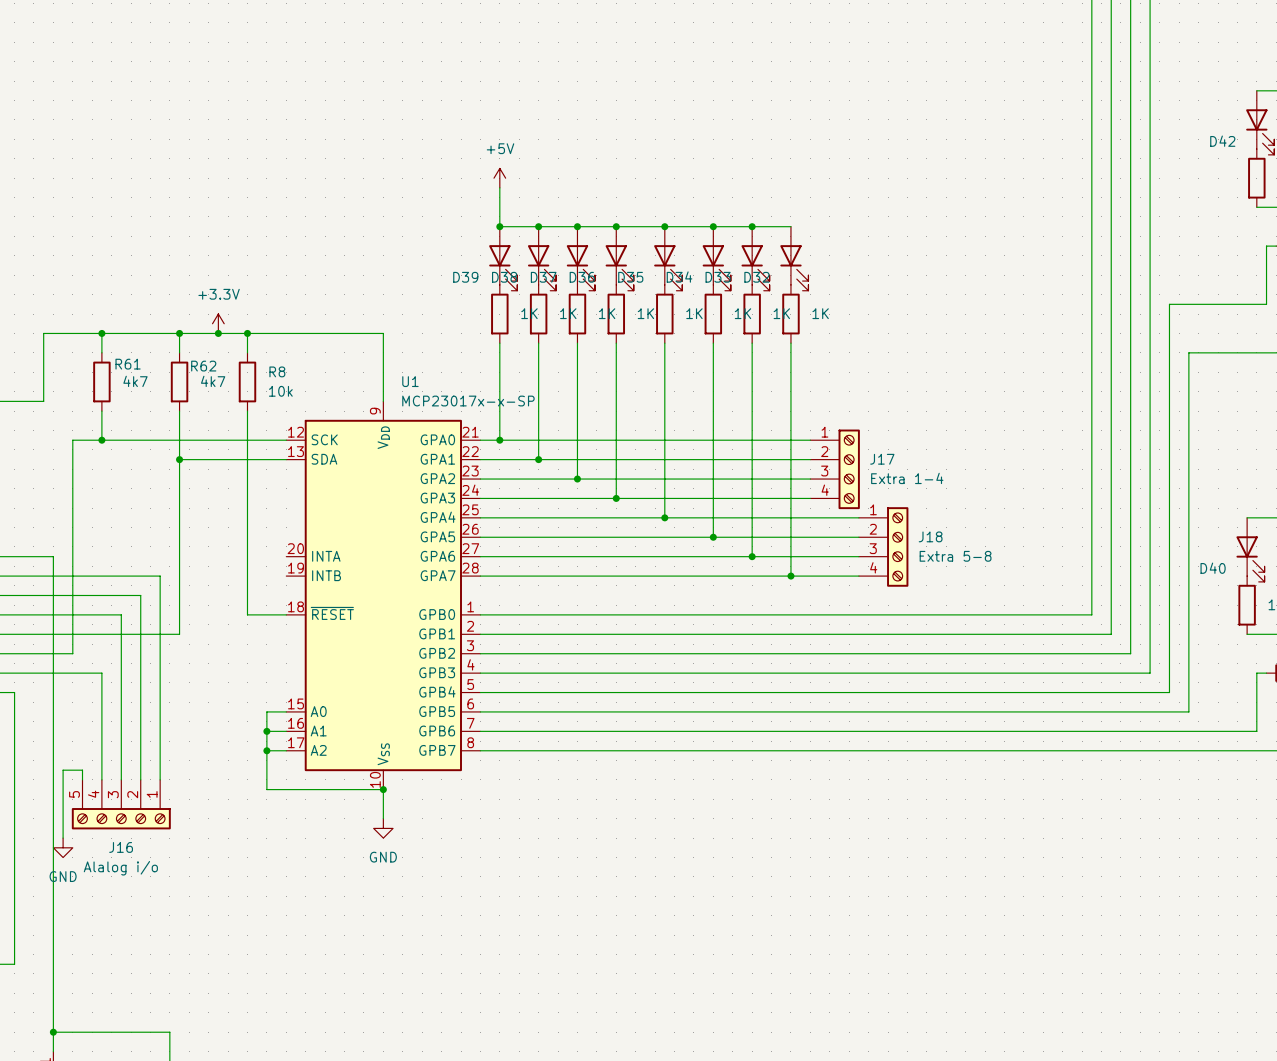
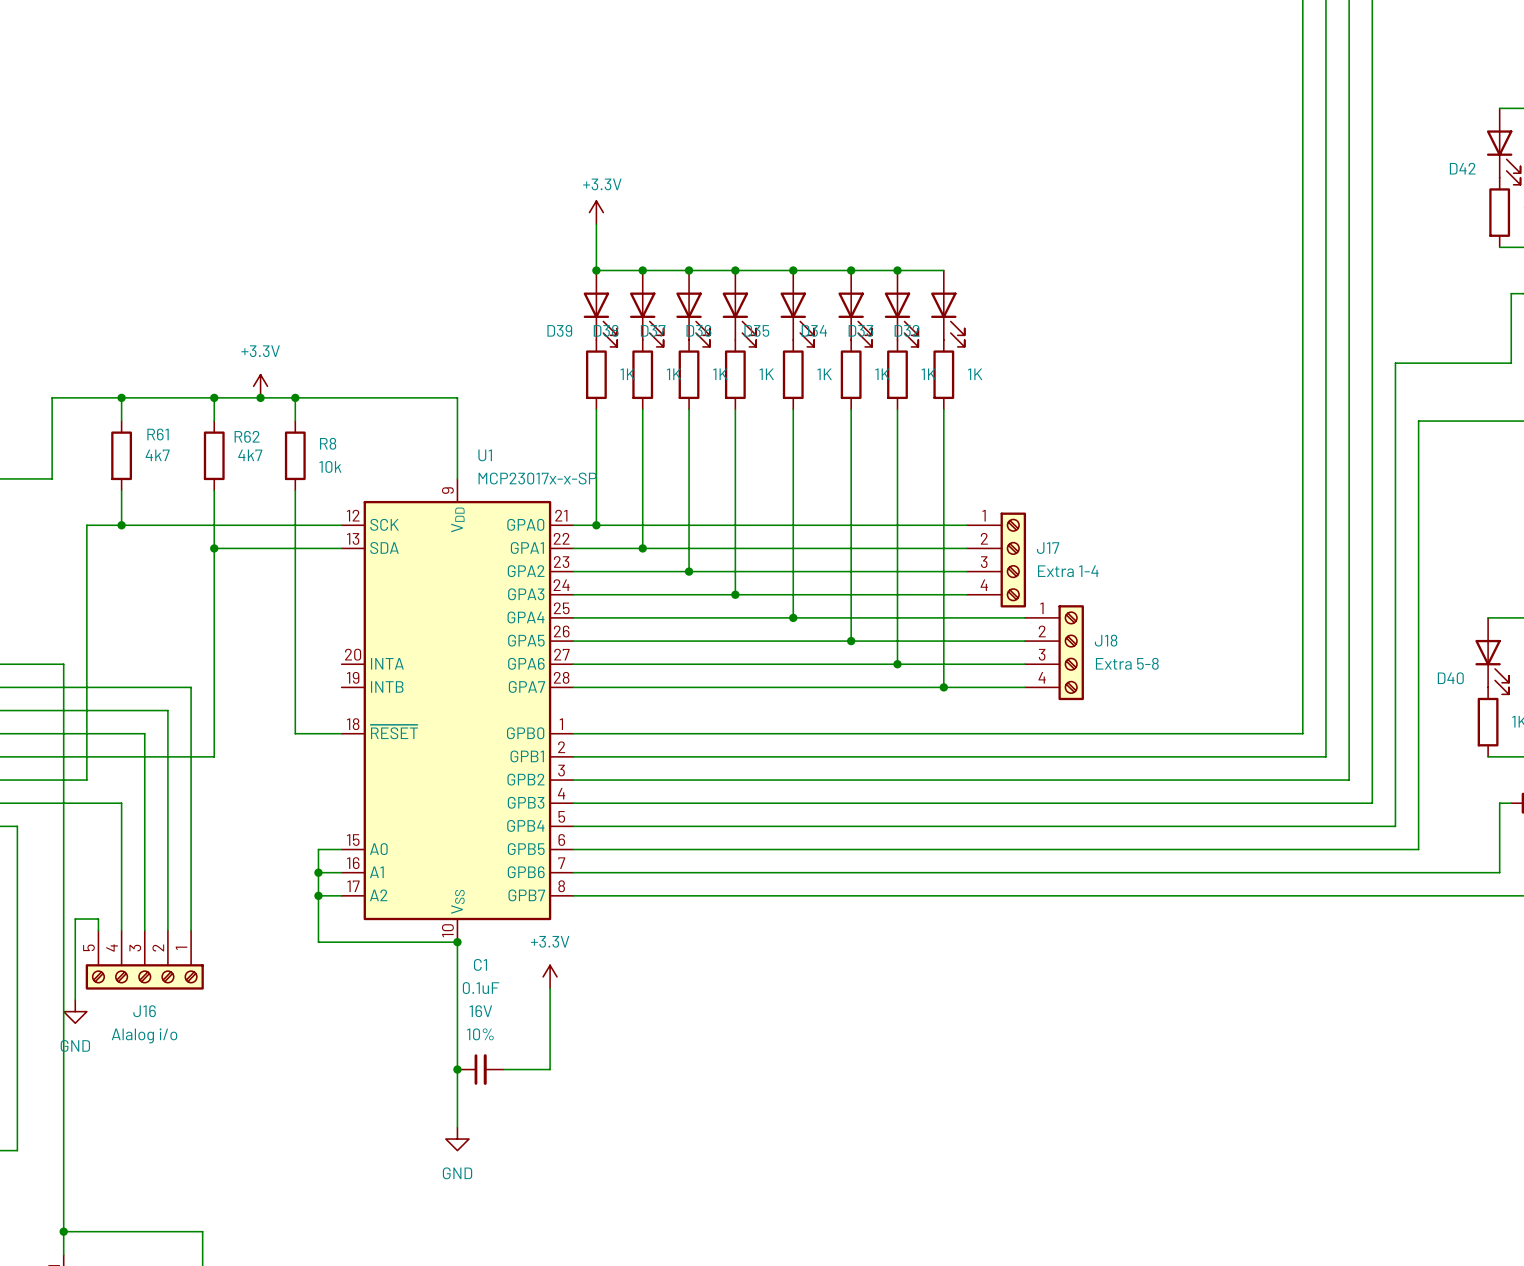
power symbol: +5V (499, 178) -> +3.3V (596, 212)
wire: none -> (457, 976) (457, 1127)
power symbol: none -> +3.3V (550, 976)
power symbol position: GND (383, 828) -> GND (457, 1139)
wire: none -> (550, 988) (550, 1069) (503, 1069)
junction: none -> (457, 1069)
C1: none -> 0.1uF (480, 1069)

